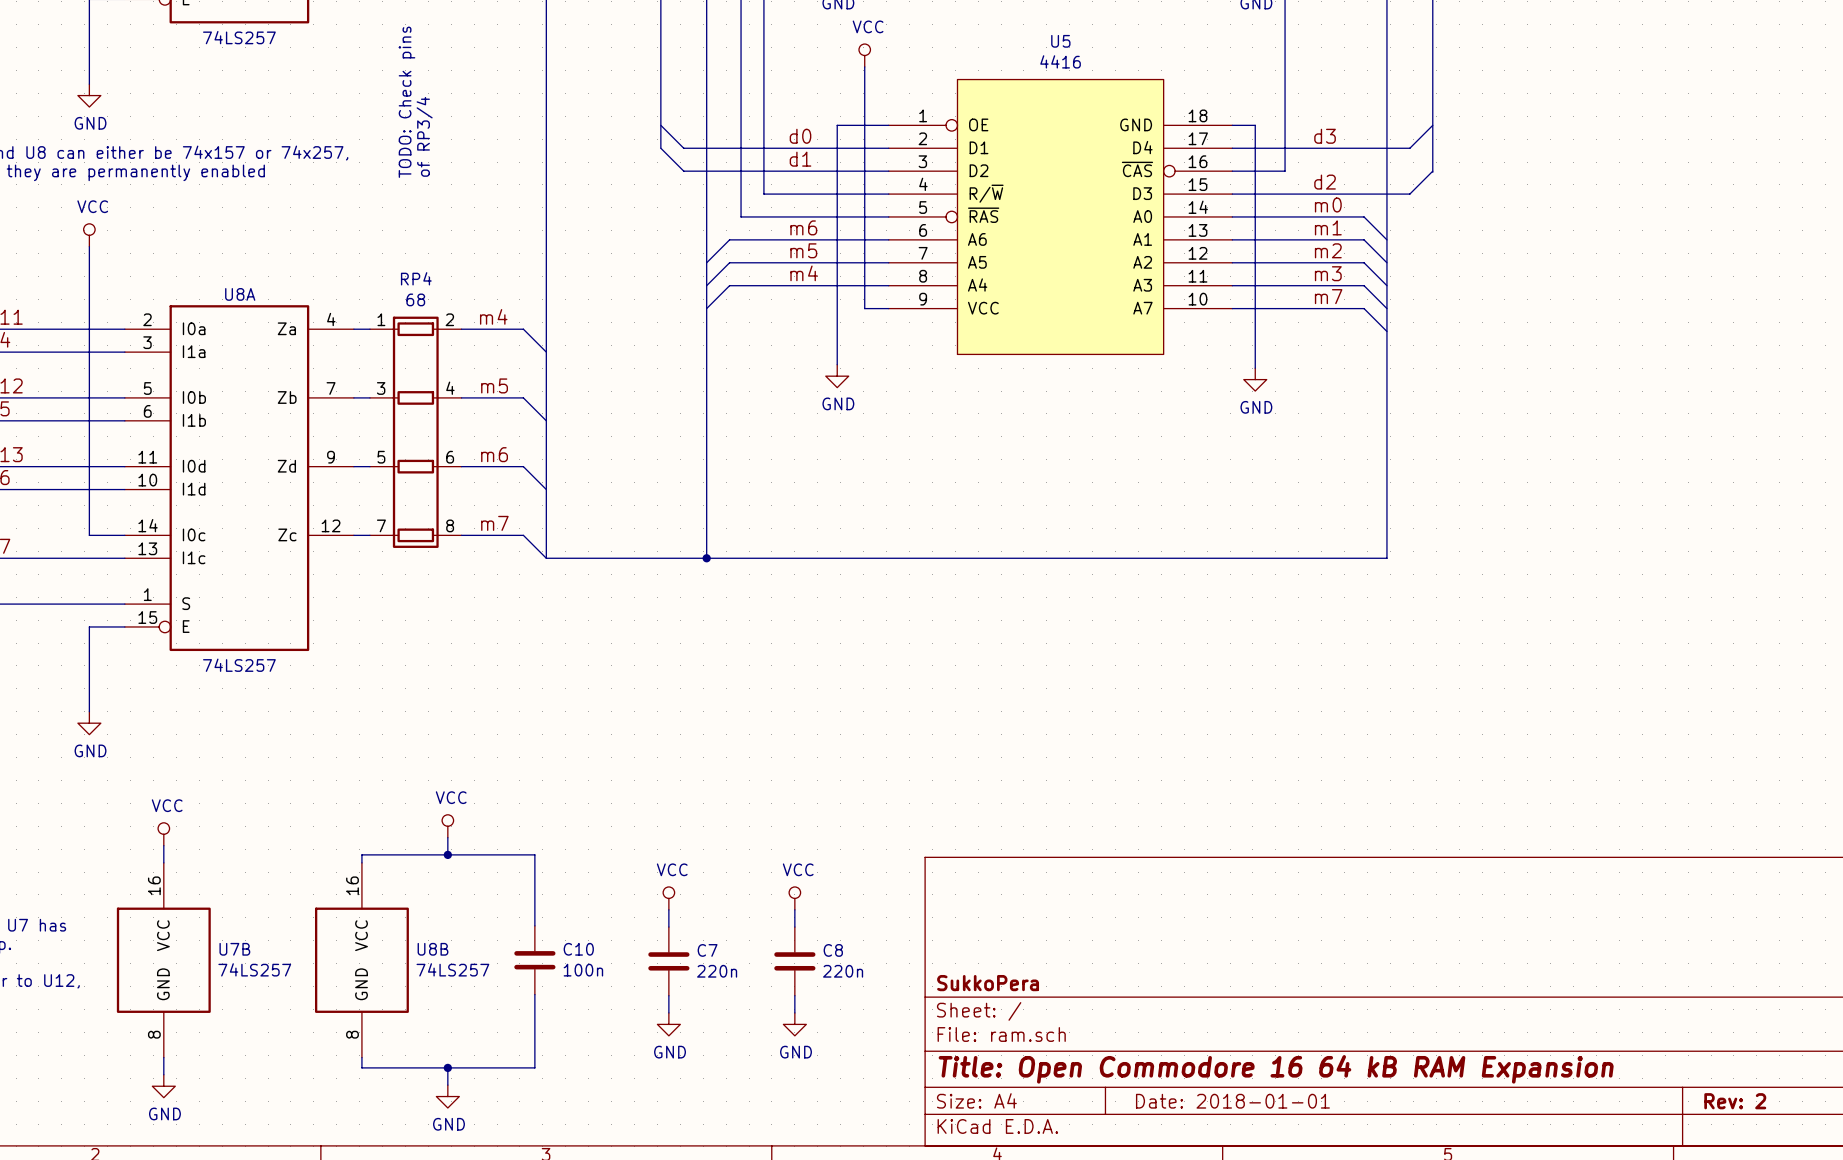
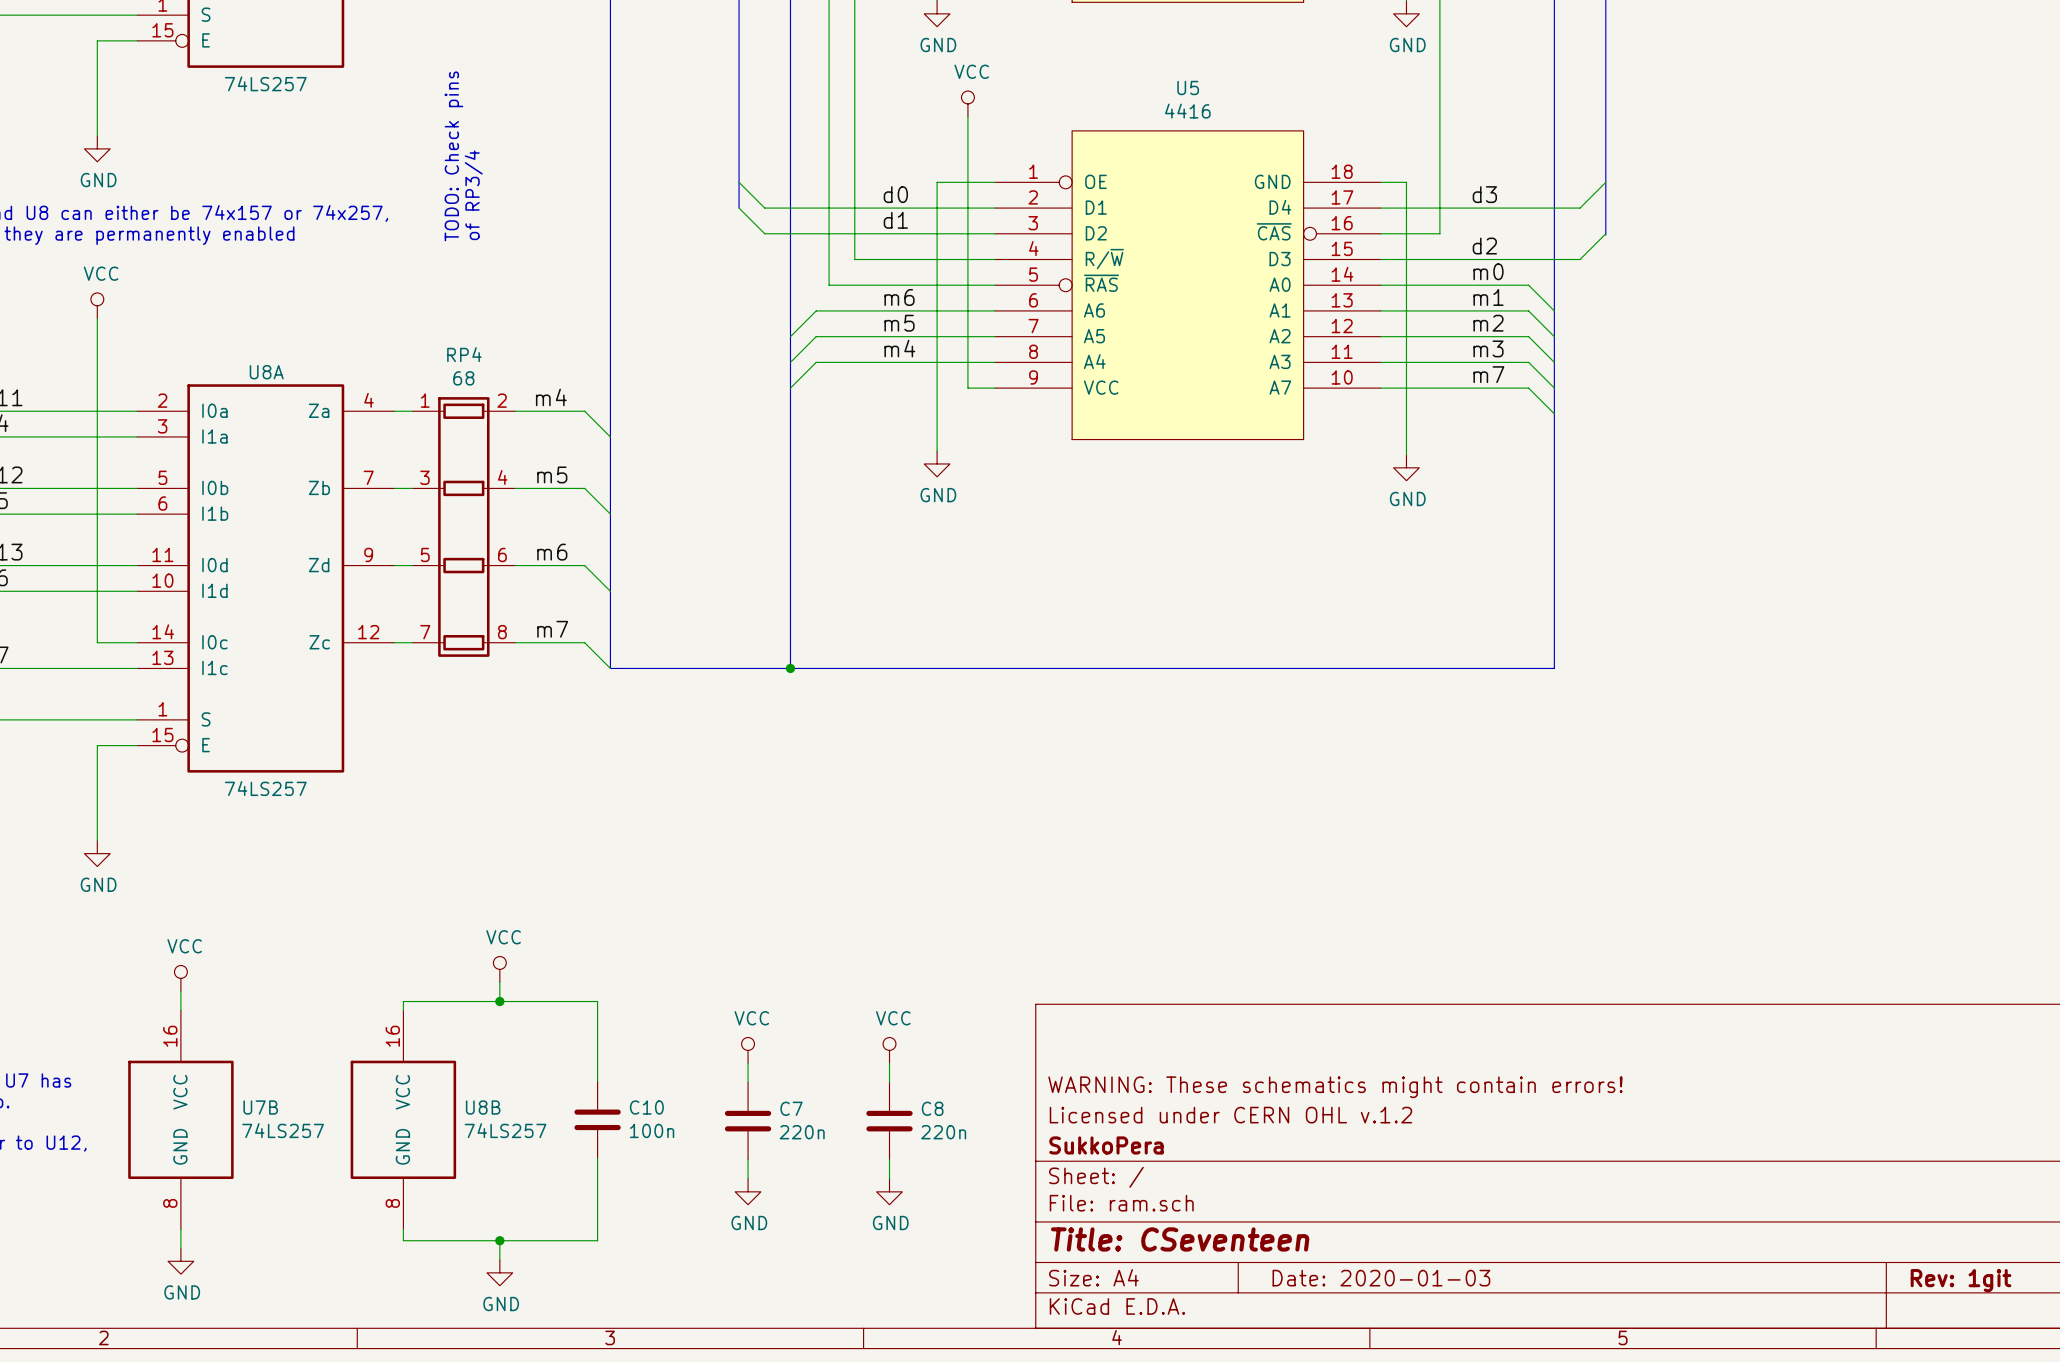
title block: none -> WARNING: These schematics might contain errors! (1335, 1087)
title block: none -> Licensed under CERN OHL v.1.2 (1230, 1115)
title block: Title: Open Commodore 16 64 kB RAM Expansion (1276, 1069) -> Title: CSeventeen (1180, 1239)
title block: Date: 2018-01-01 (1232, 1101) -> Date: 2020-01-03 (1381, 1278)
title block: Rev: 2 (1735, 1101) -> Rev: 1git (1961, 1280)

